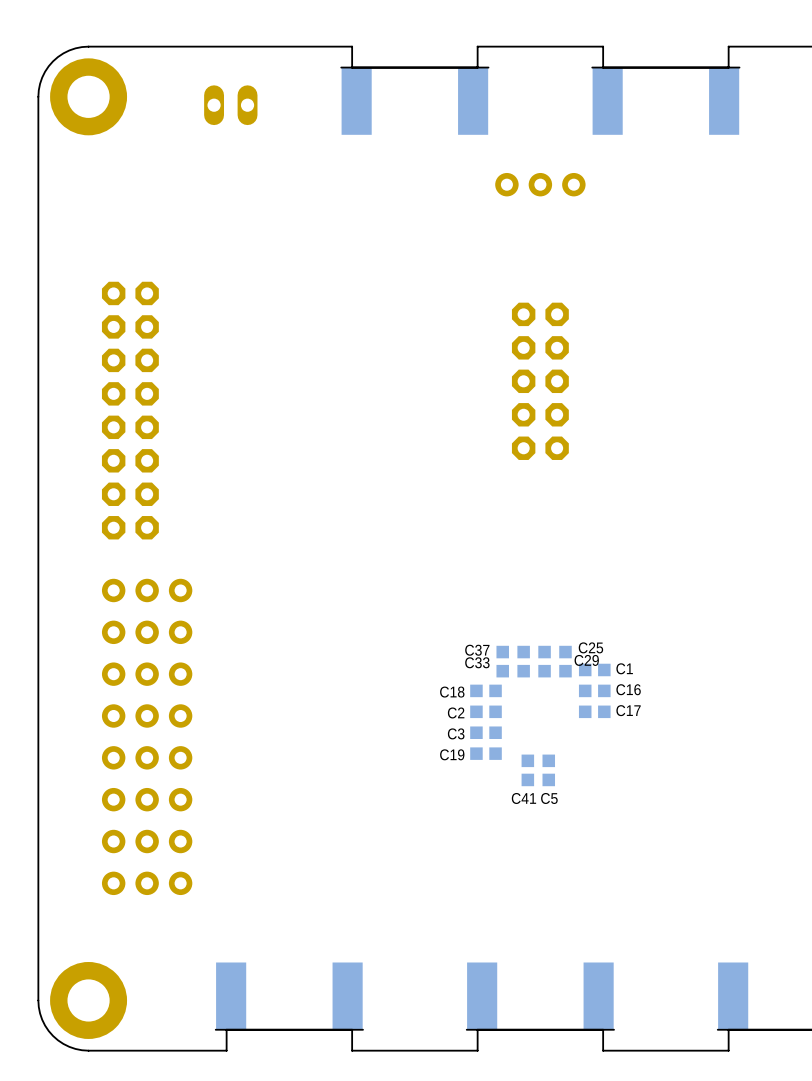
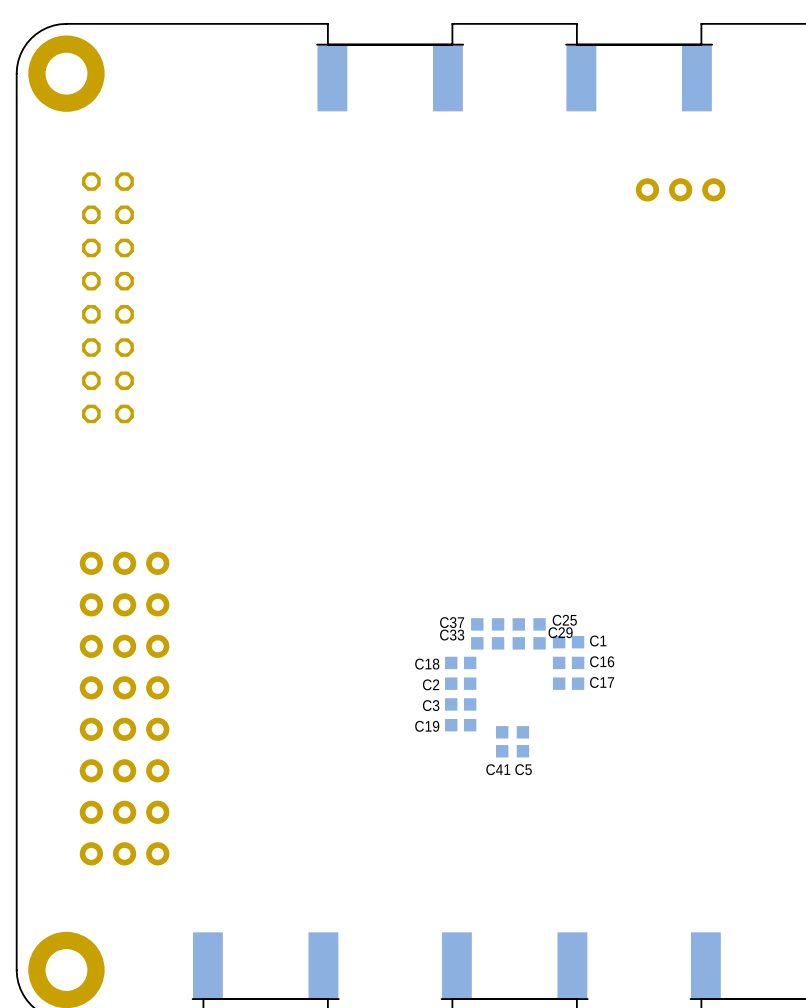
part: (230, 105) -> none
part position: (540, 184) -> (680, 189)
part: none -> (107, 297)
part: (540, 381) -> none
part: (130, 410) -> none

